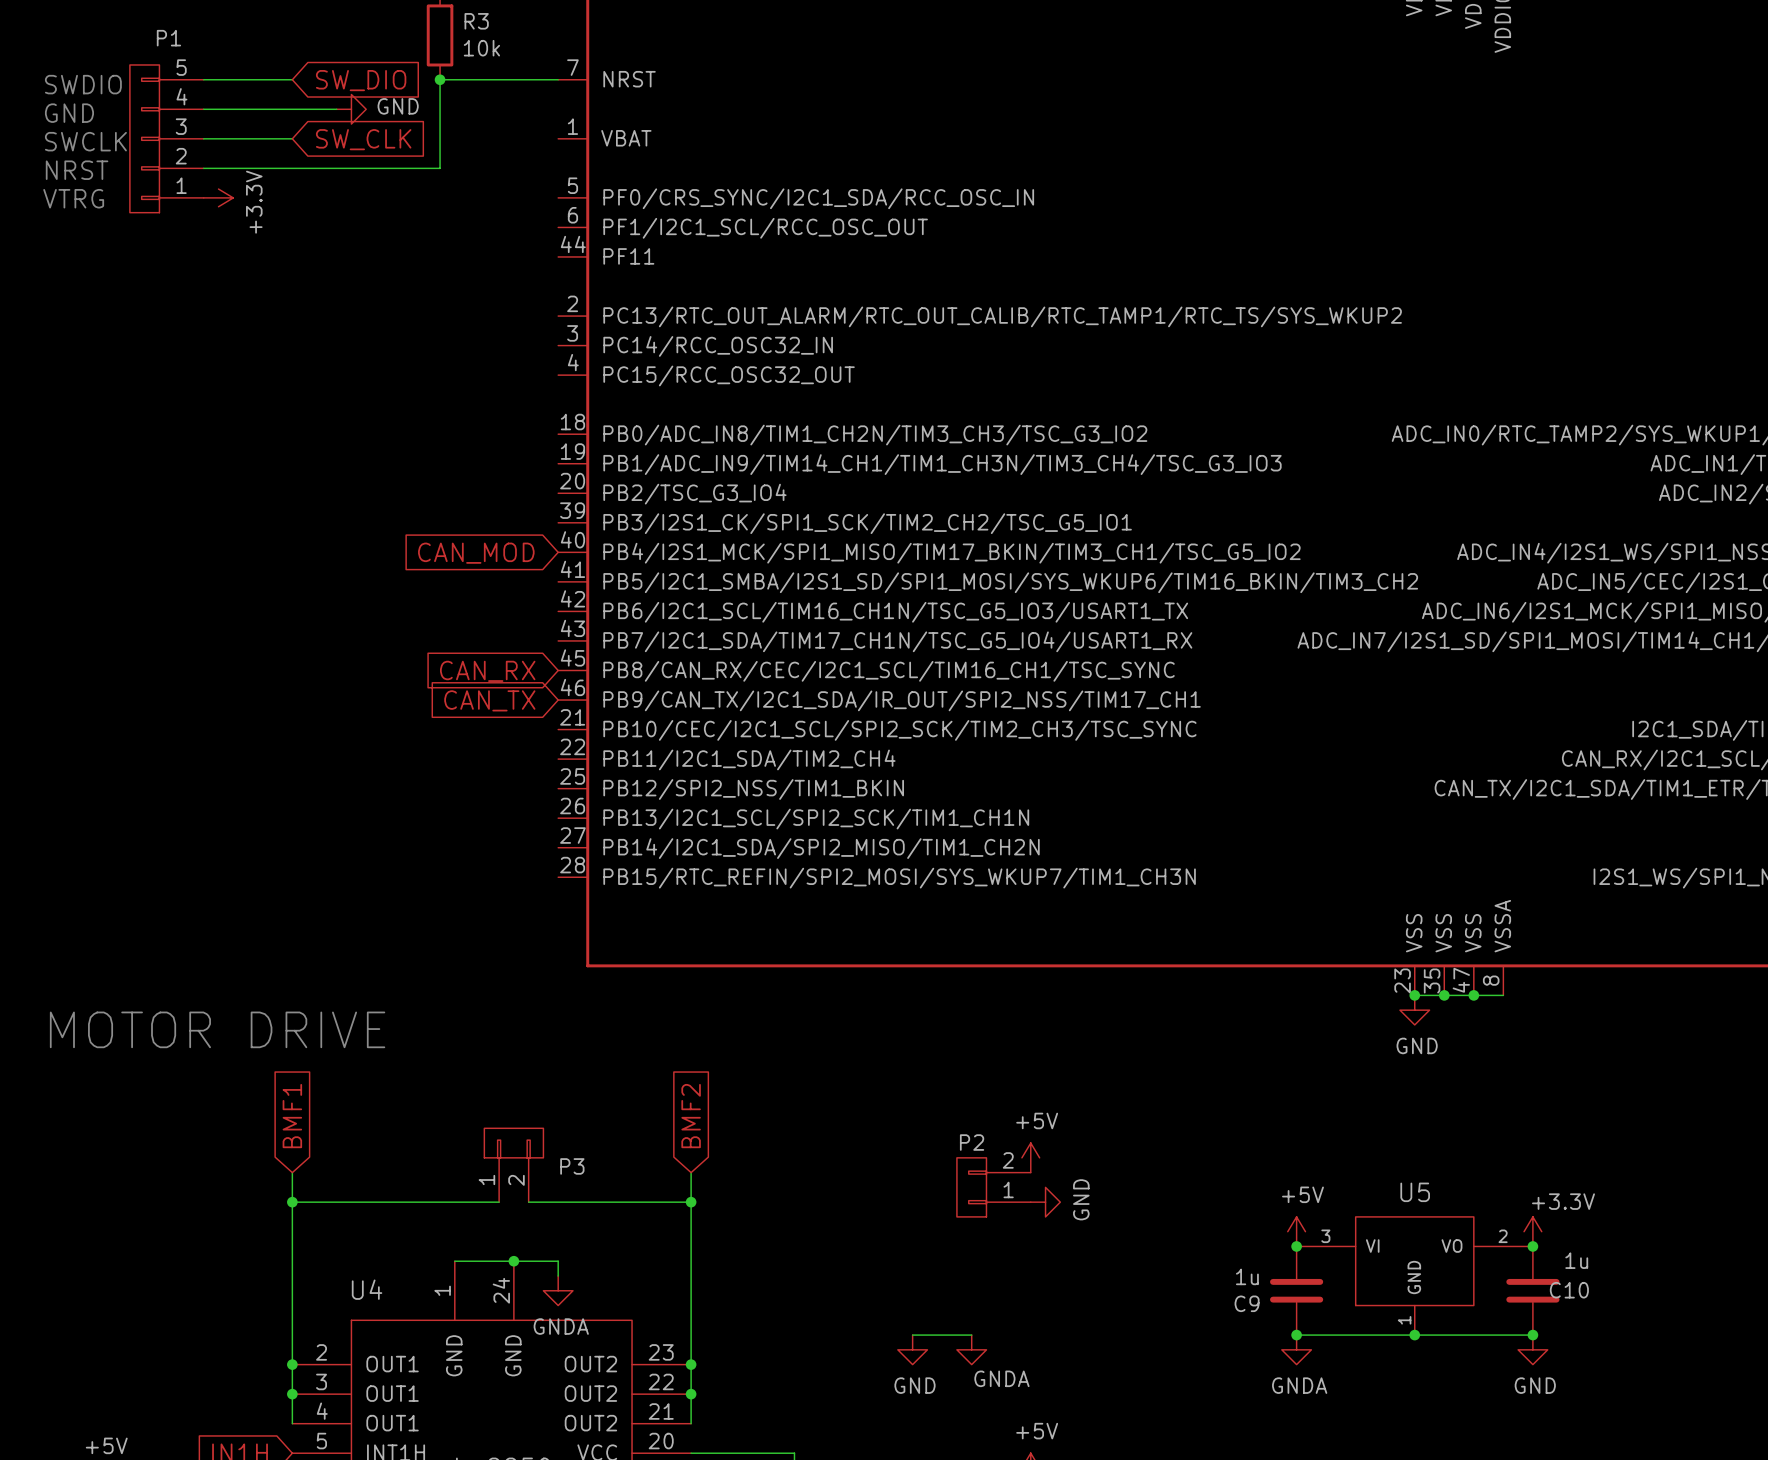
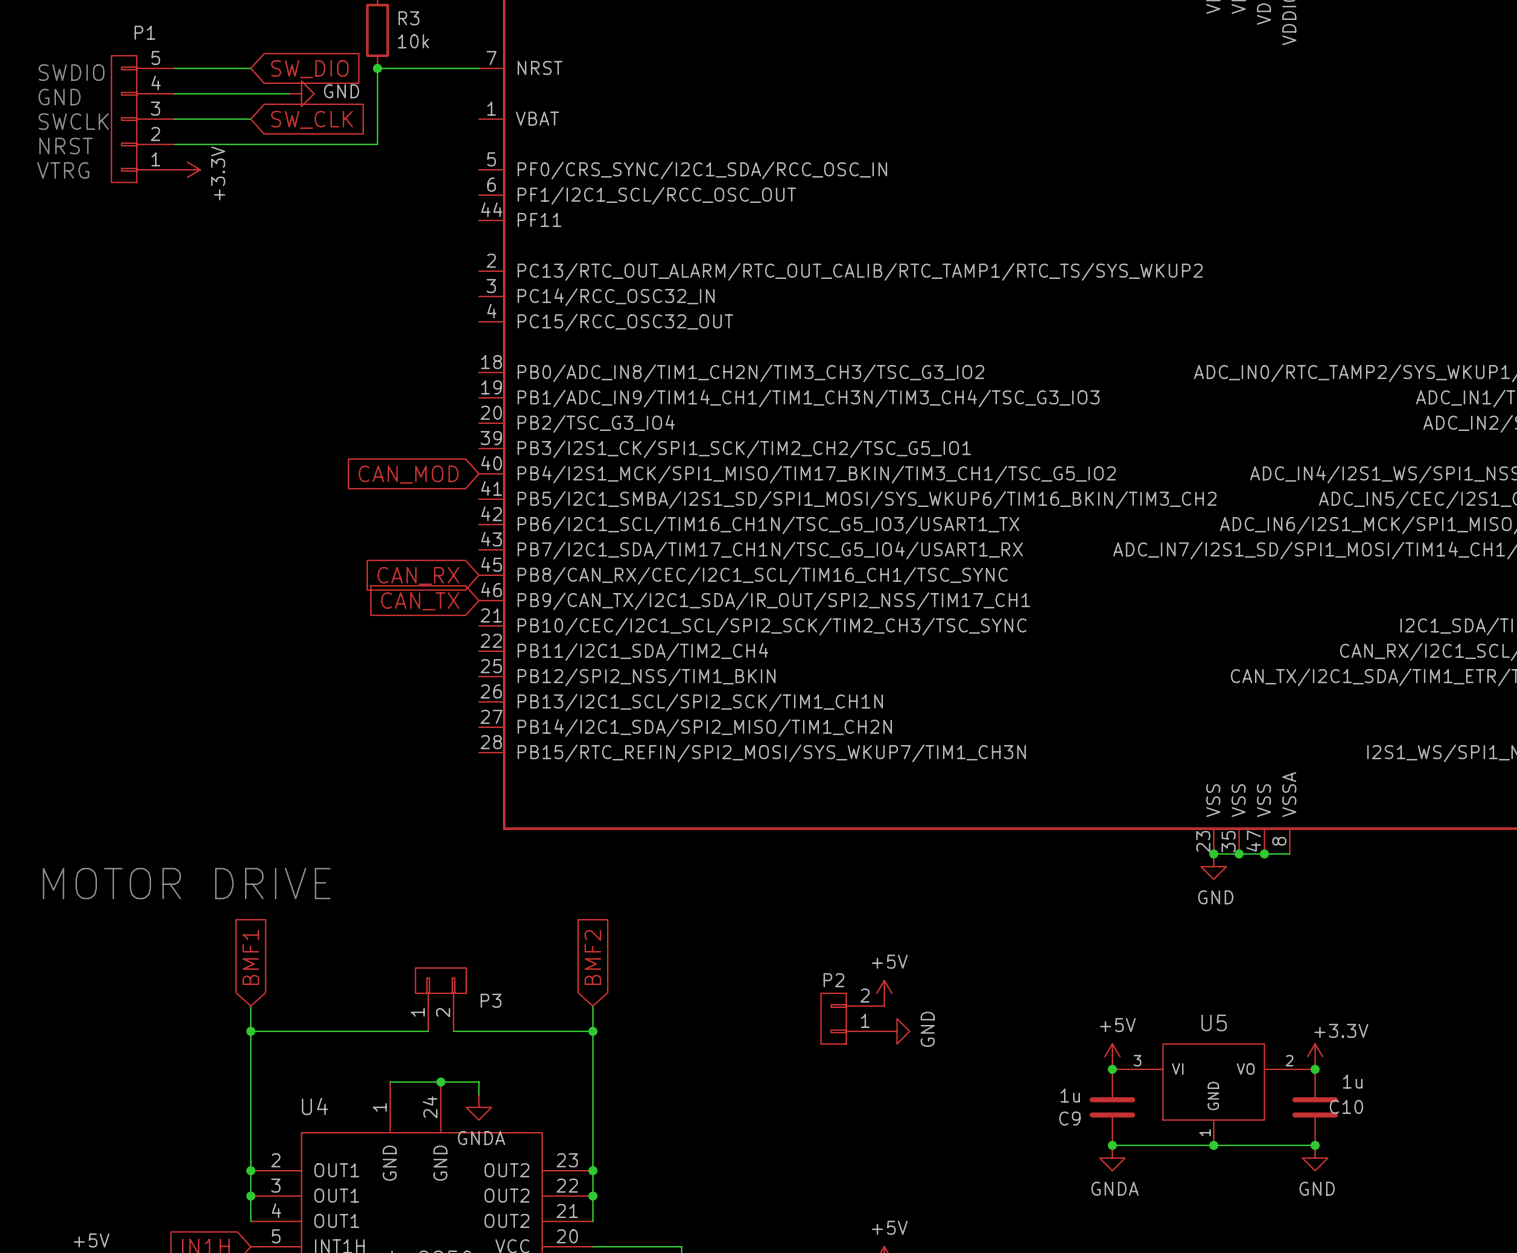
wire: (912, 1335) (971, 1335) -> none
power symbol: GND (912, 1349) -> none
power symbol: GNDA (971, 1349) -> none

